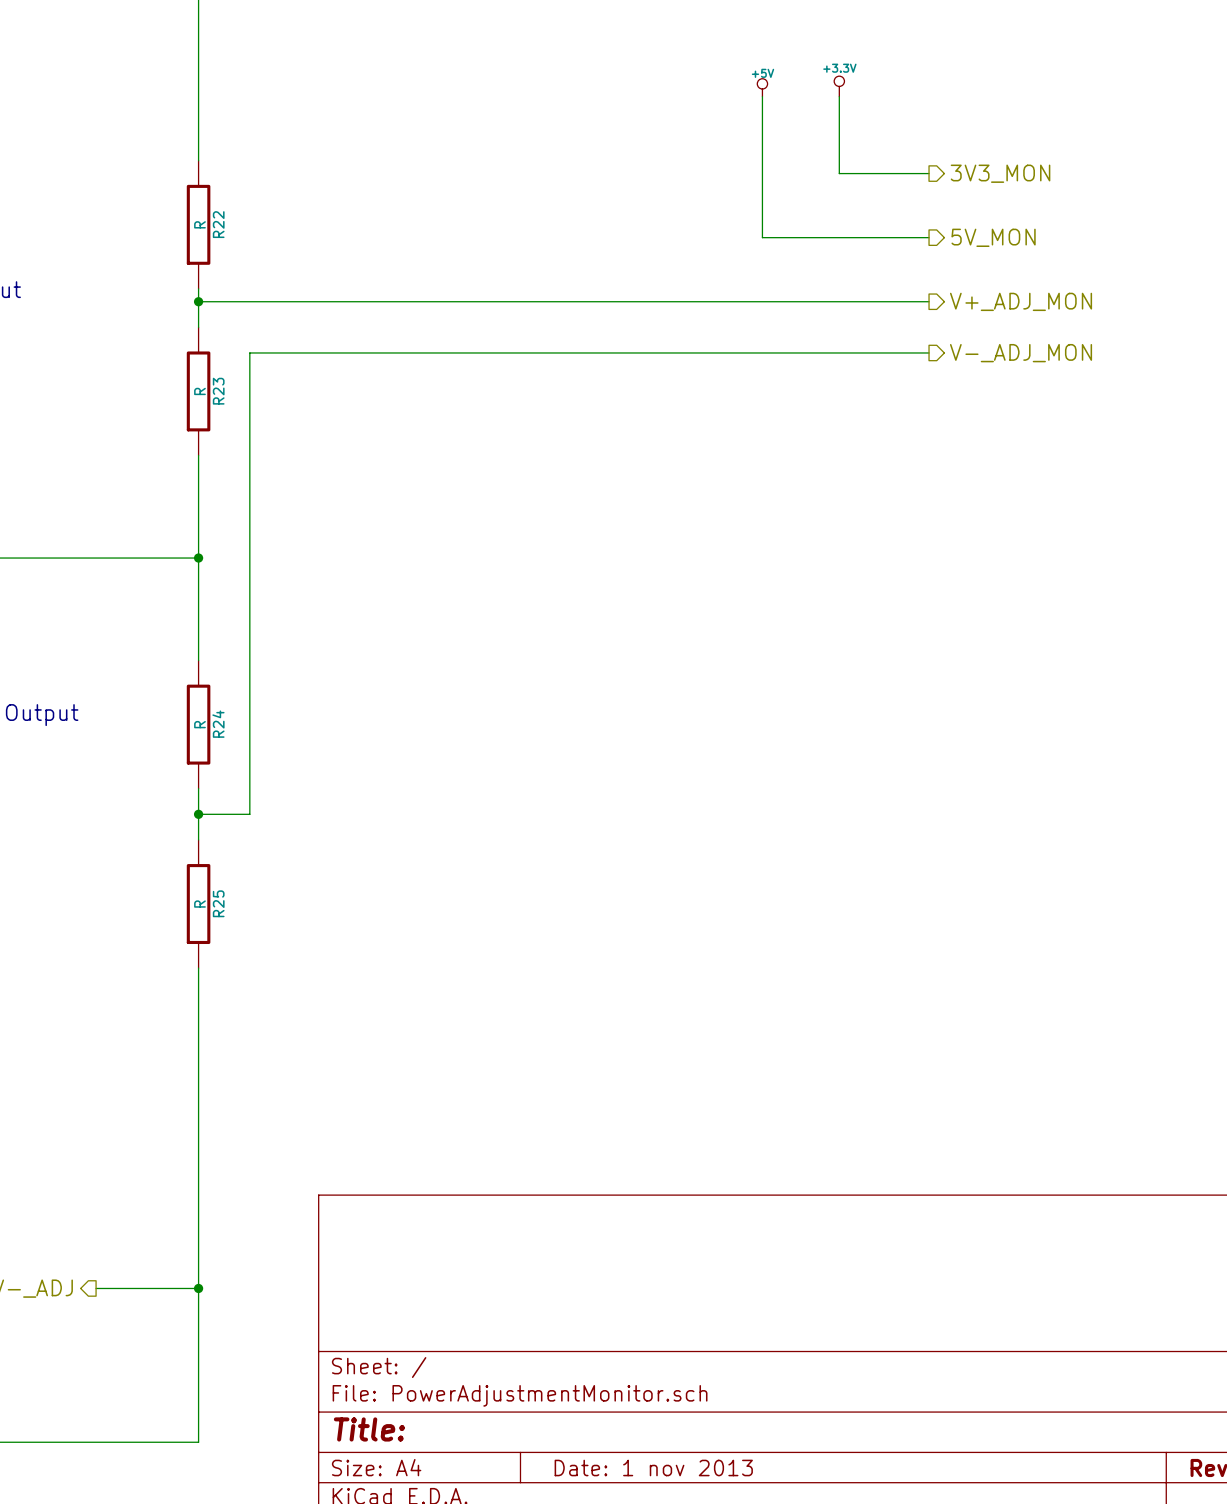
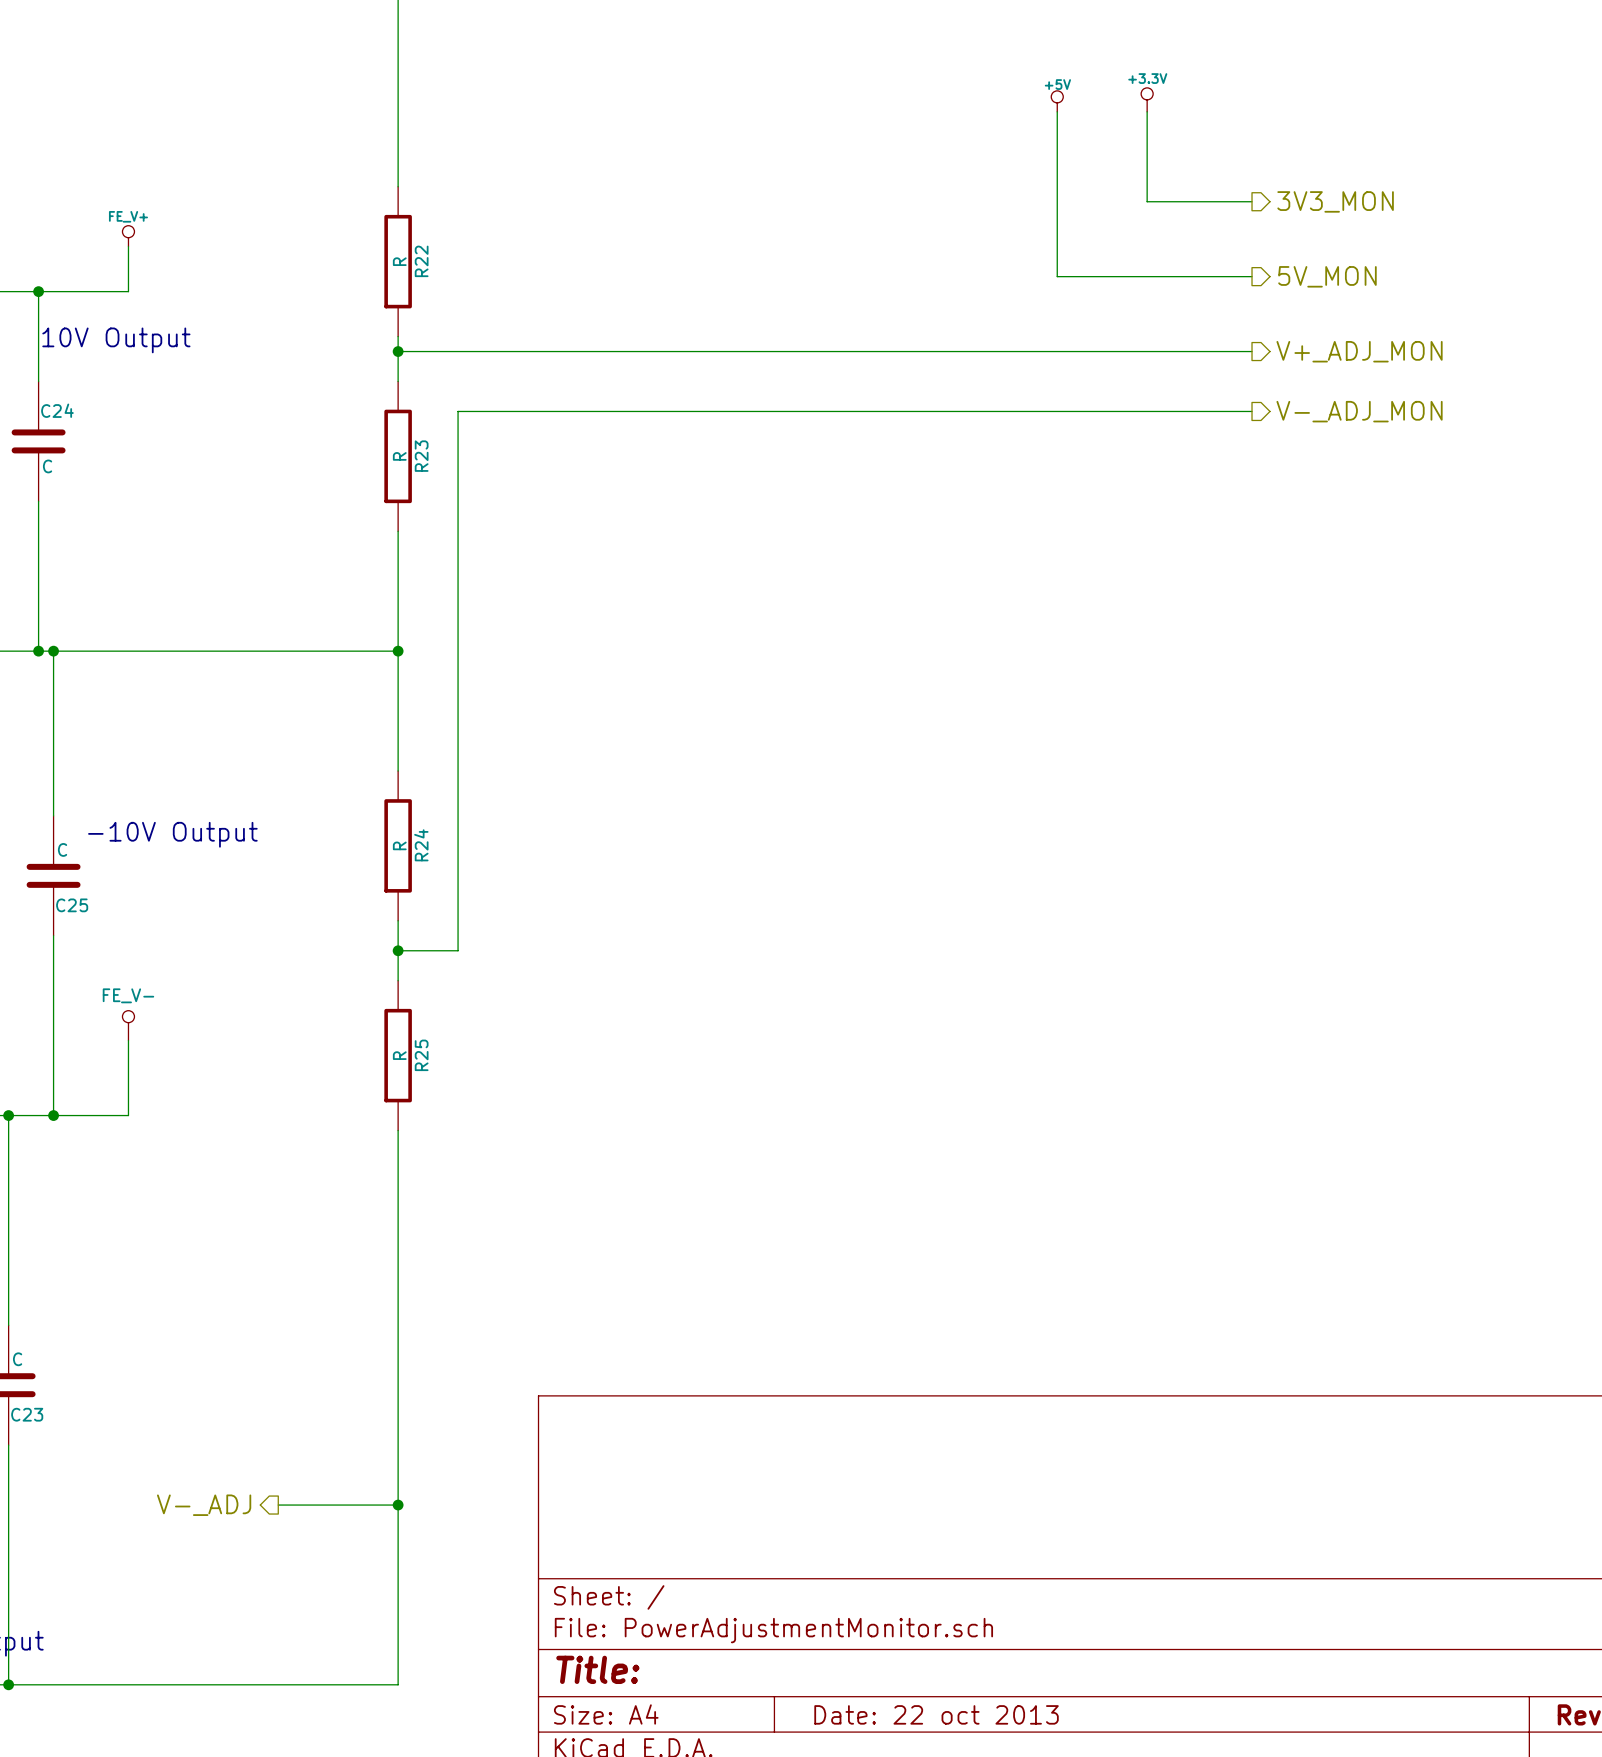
title block: Date: 1 nov 2013 (653, 1467) -> Date: 22 oct 2013 (936, 1714)

